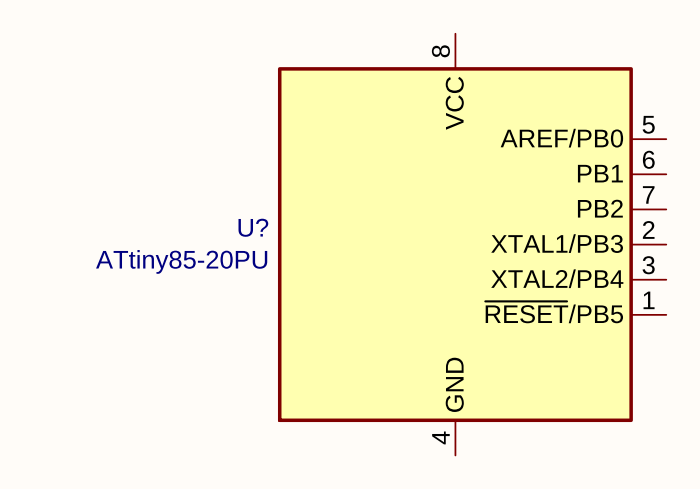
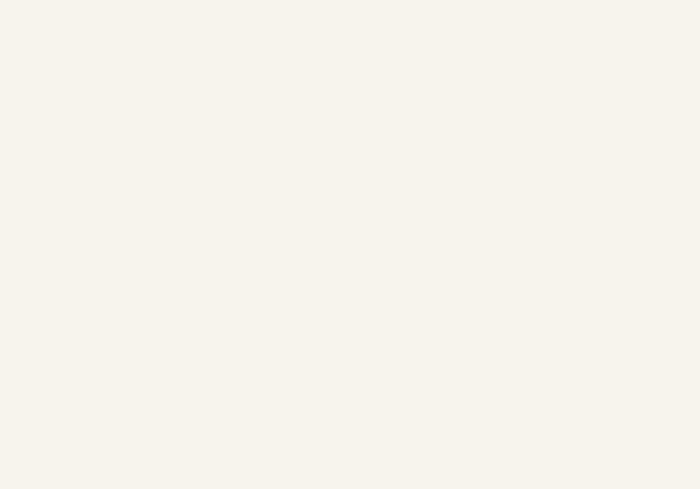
U?: ATtiny85-20PU (472, 244) -> none

